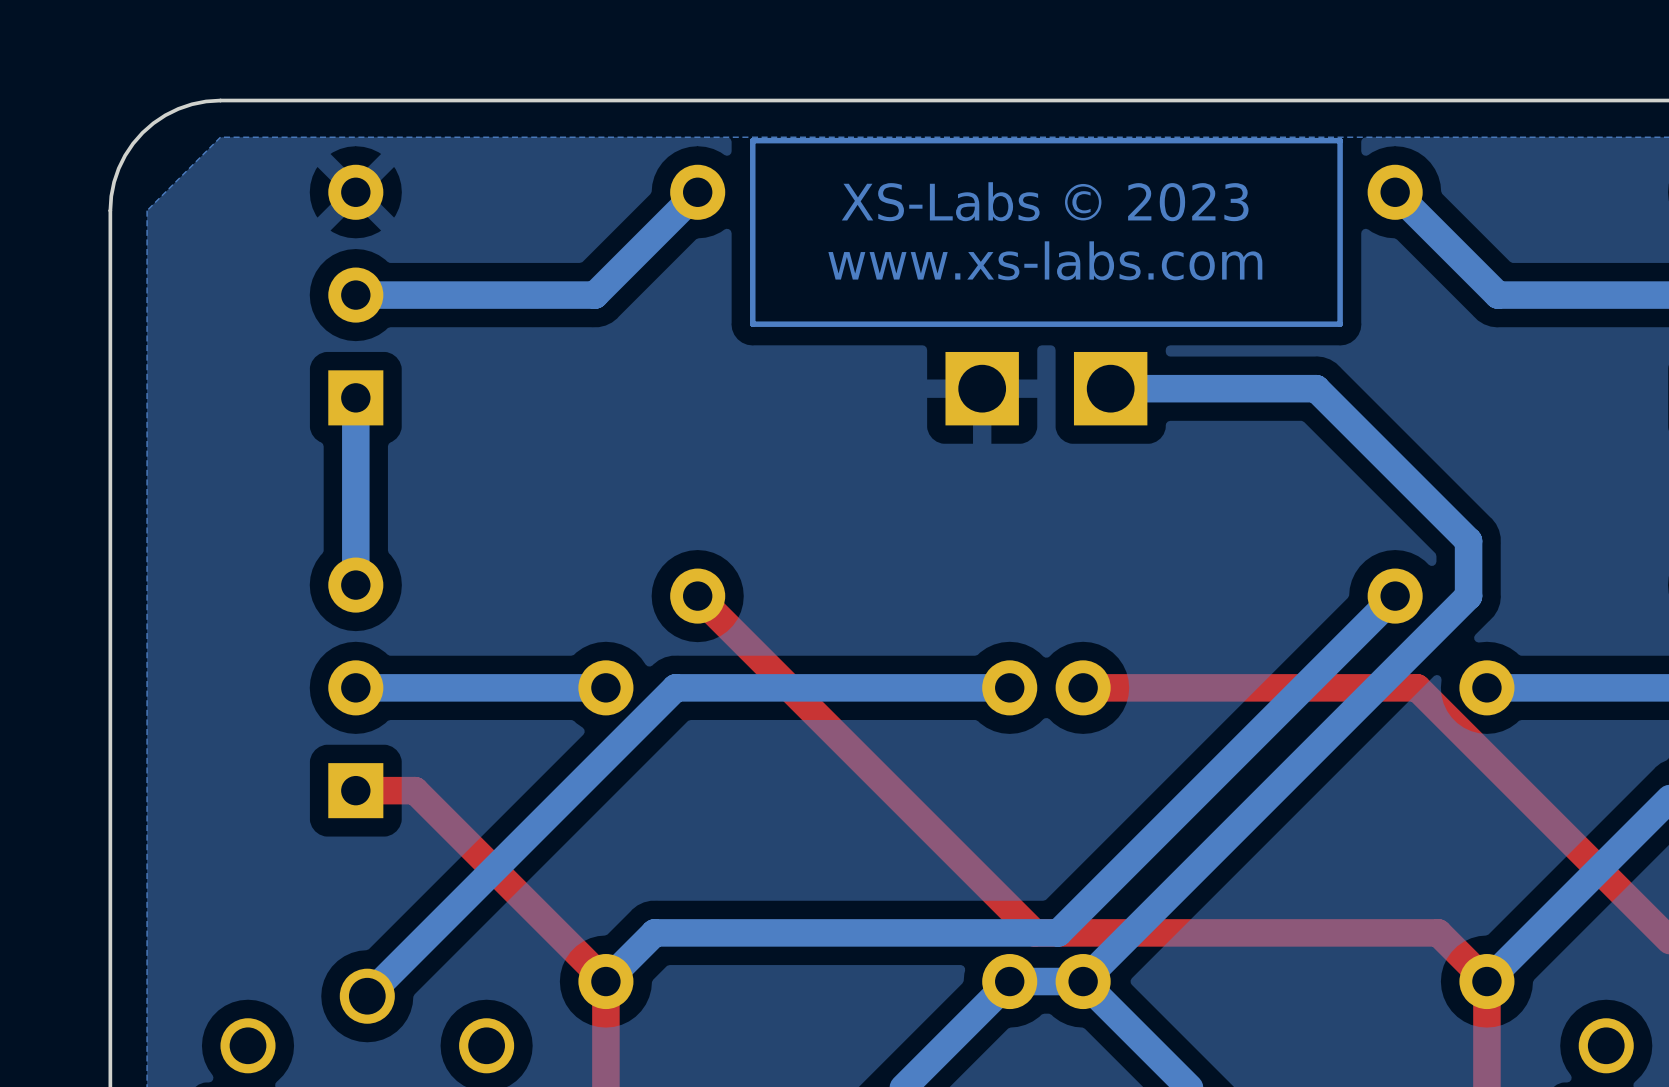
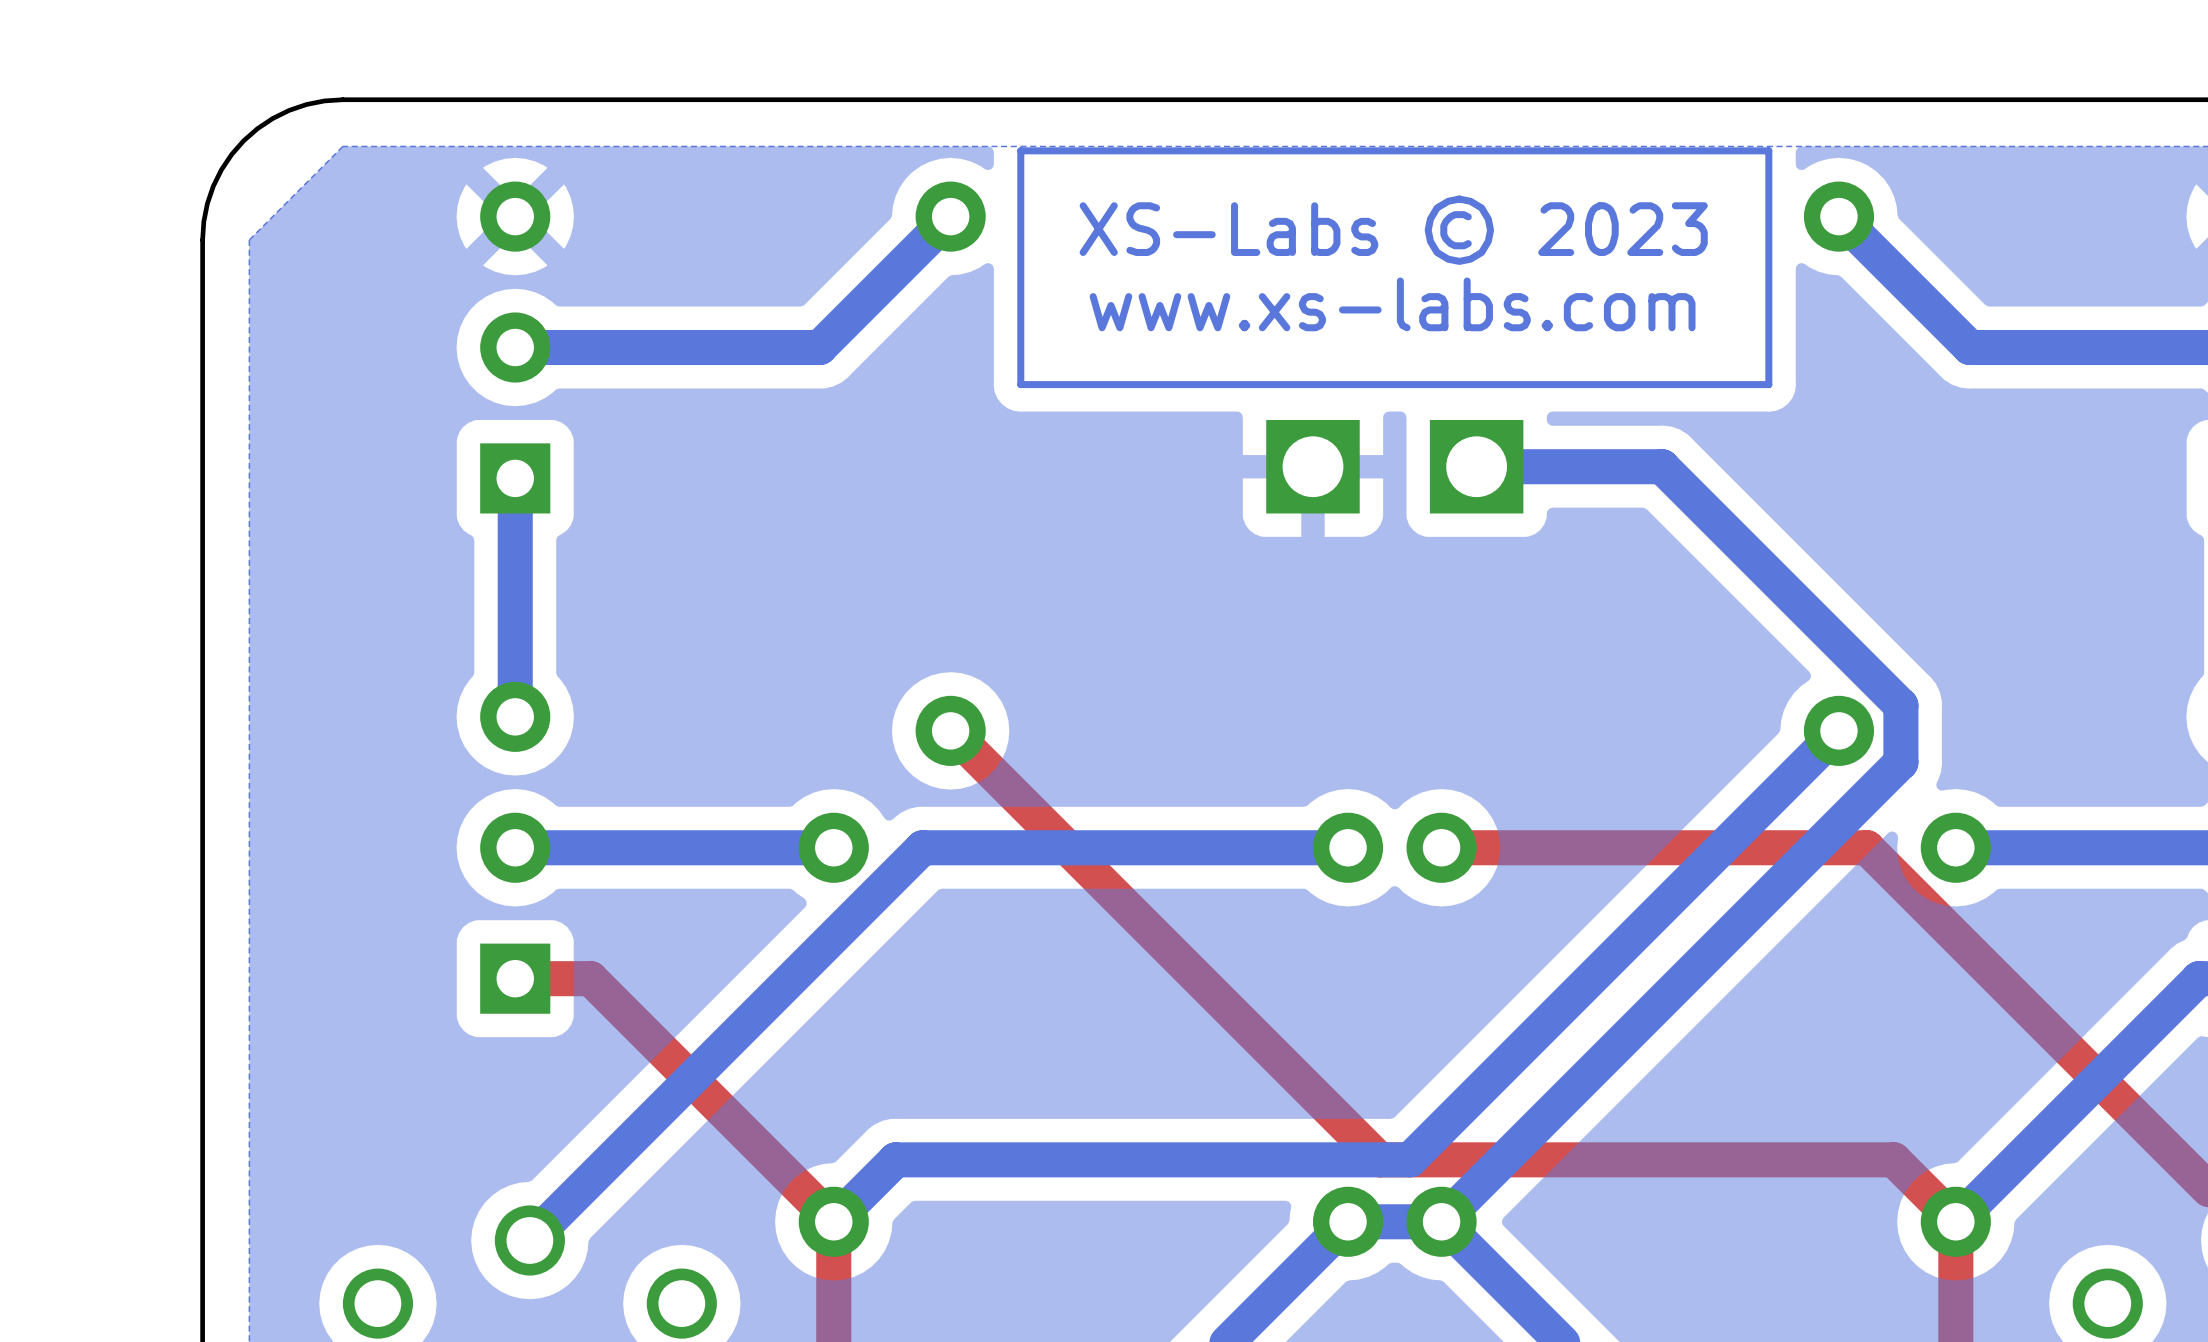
bottom track: (1256, 388) (1316, 388) (1468, 541) (1468, 596) (1443, 620) -> (1662, 466) (1900, 705) (1900, 762)

